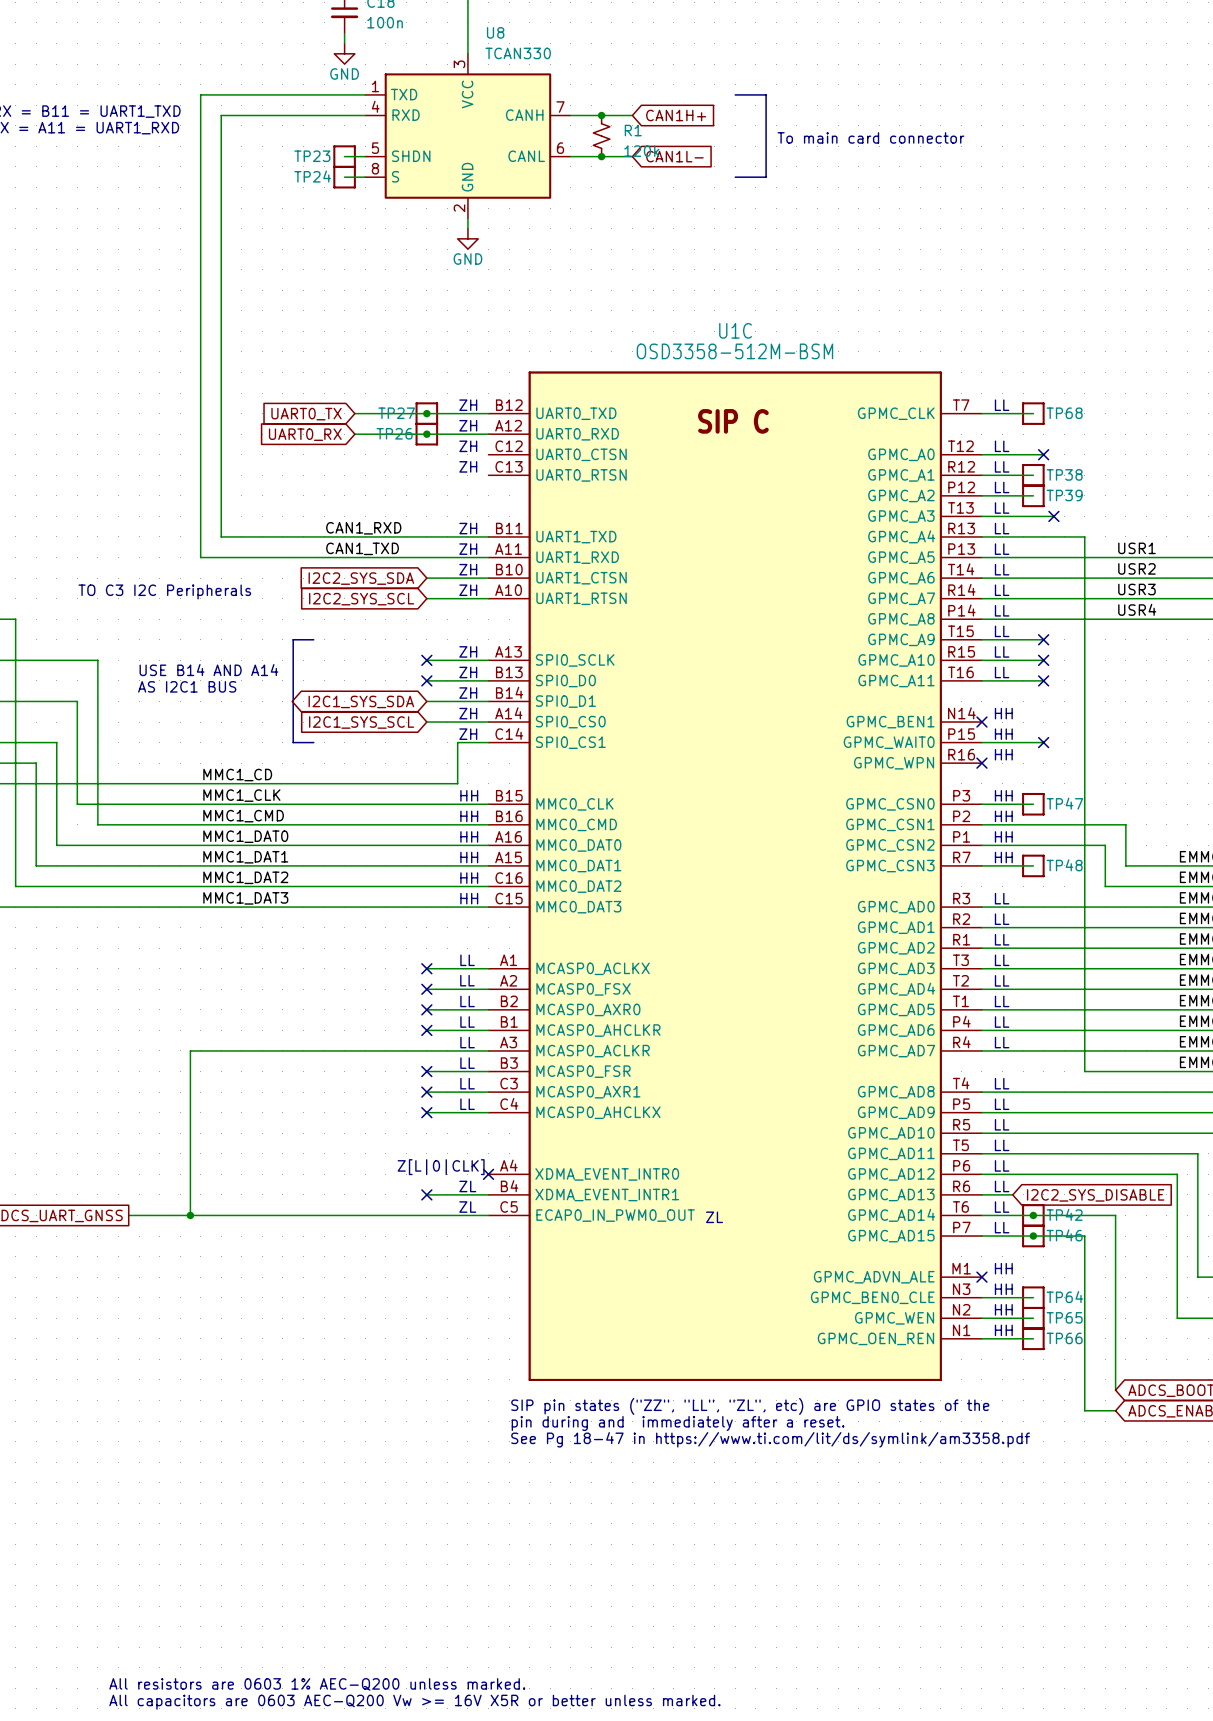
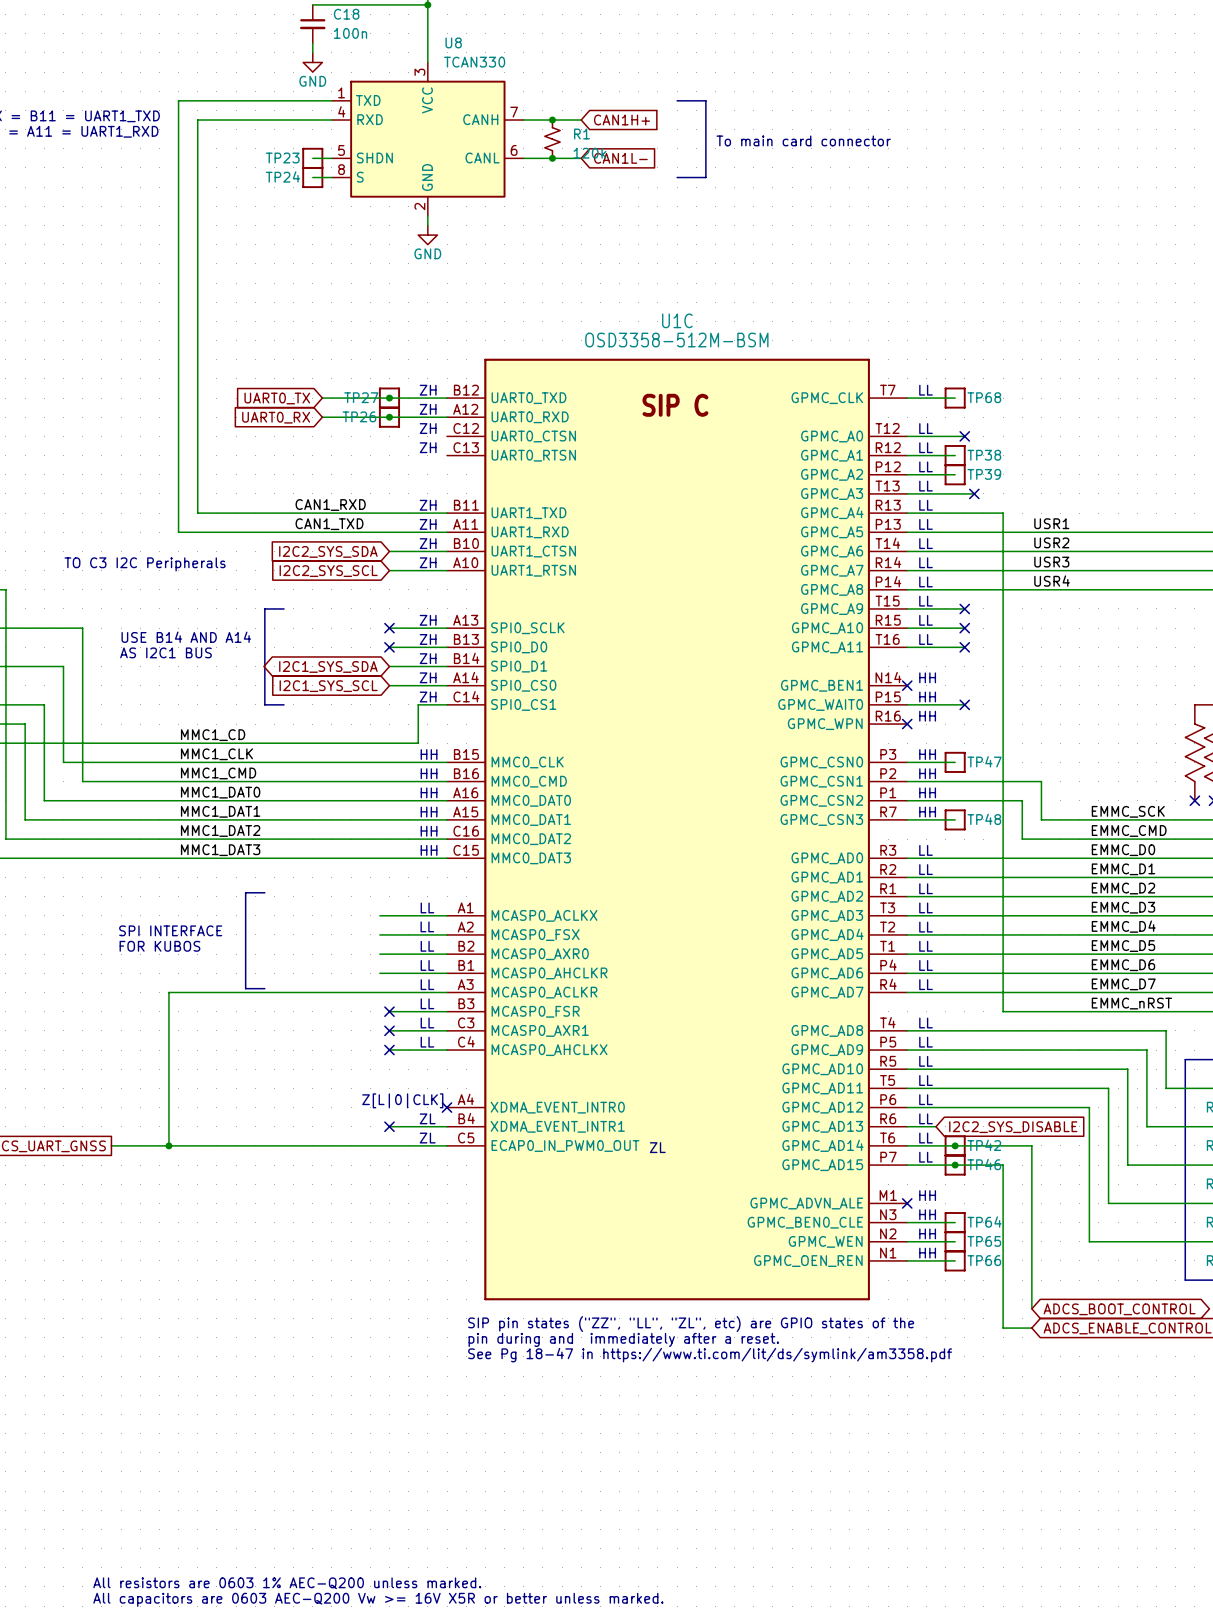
line: none -> (264, 892) (245, 892) (245, 988) (264, 988)
wire: none -> (379, 915) (389, 915)
no-connect mark: (426, 968) -> none
text: none -> SPI INTERFACE (170, 930)
wire: none -> (379, 934) (389, 934)
no-connect mark: (426, 989) -> none
text: none -> FOR KUBOS (159, 946)
wire: none -> (379, 954) (389, 954)
no-connect mark: (426, 1009) -> none
wire: none -> (379, 973) (389, 973)
no-connect mark: (426, 1030) -> none

